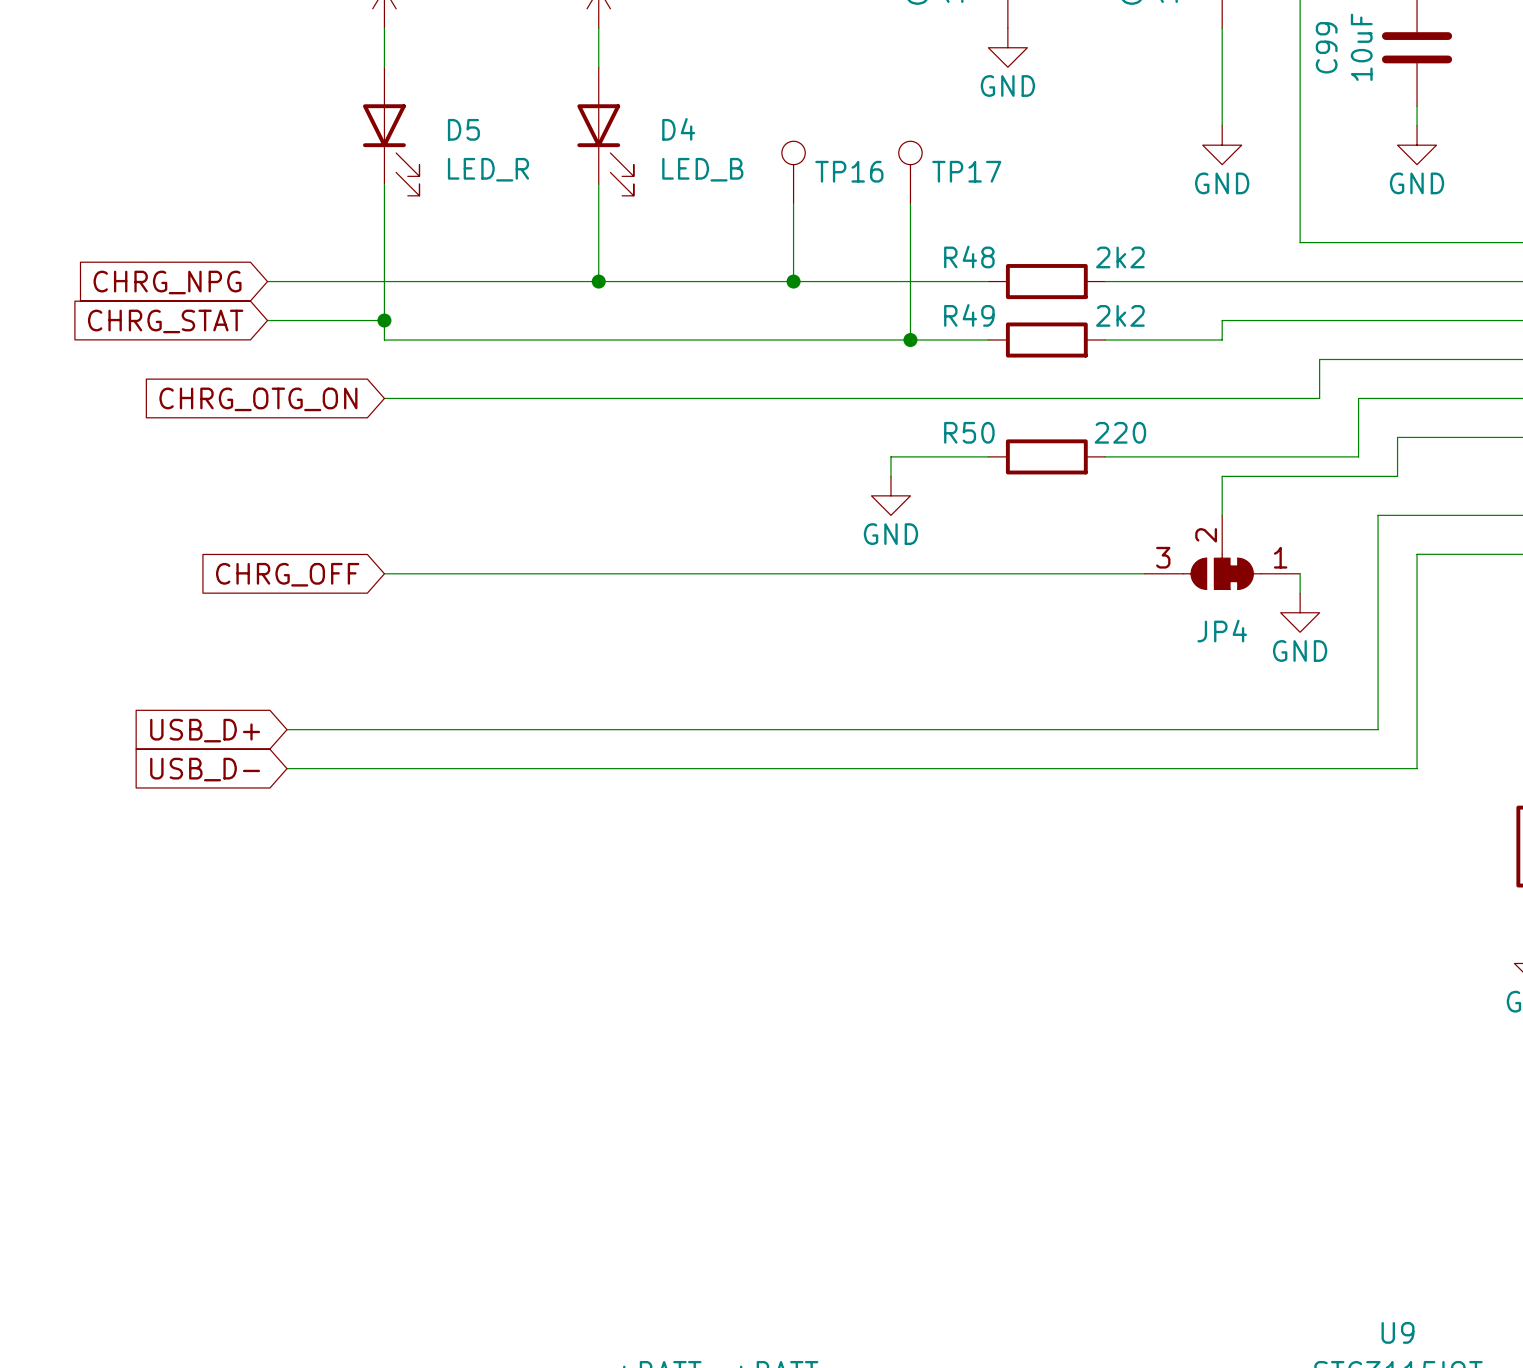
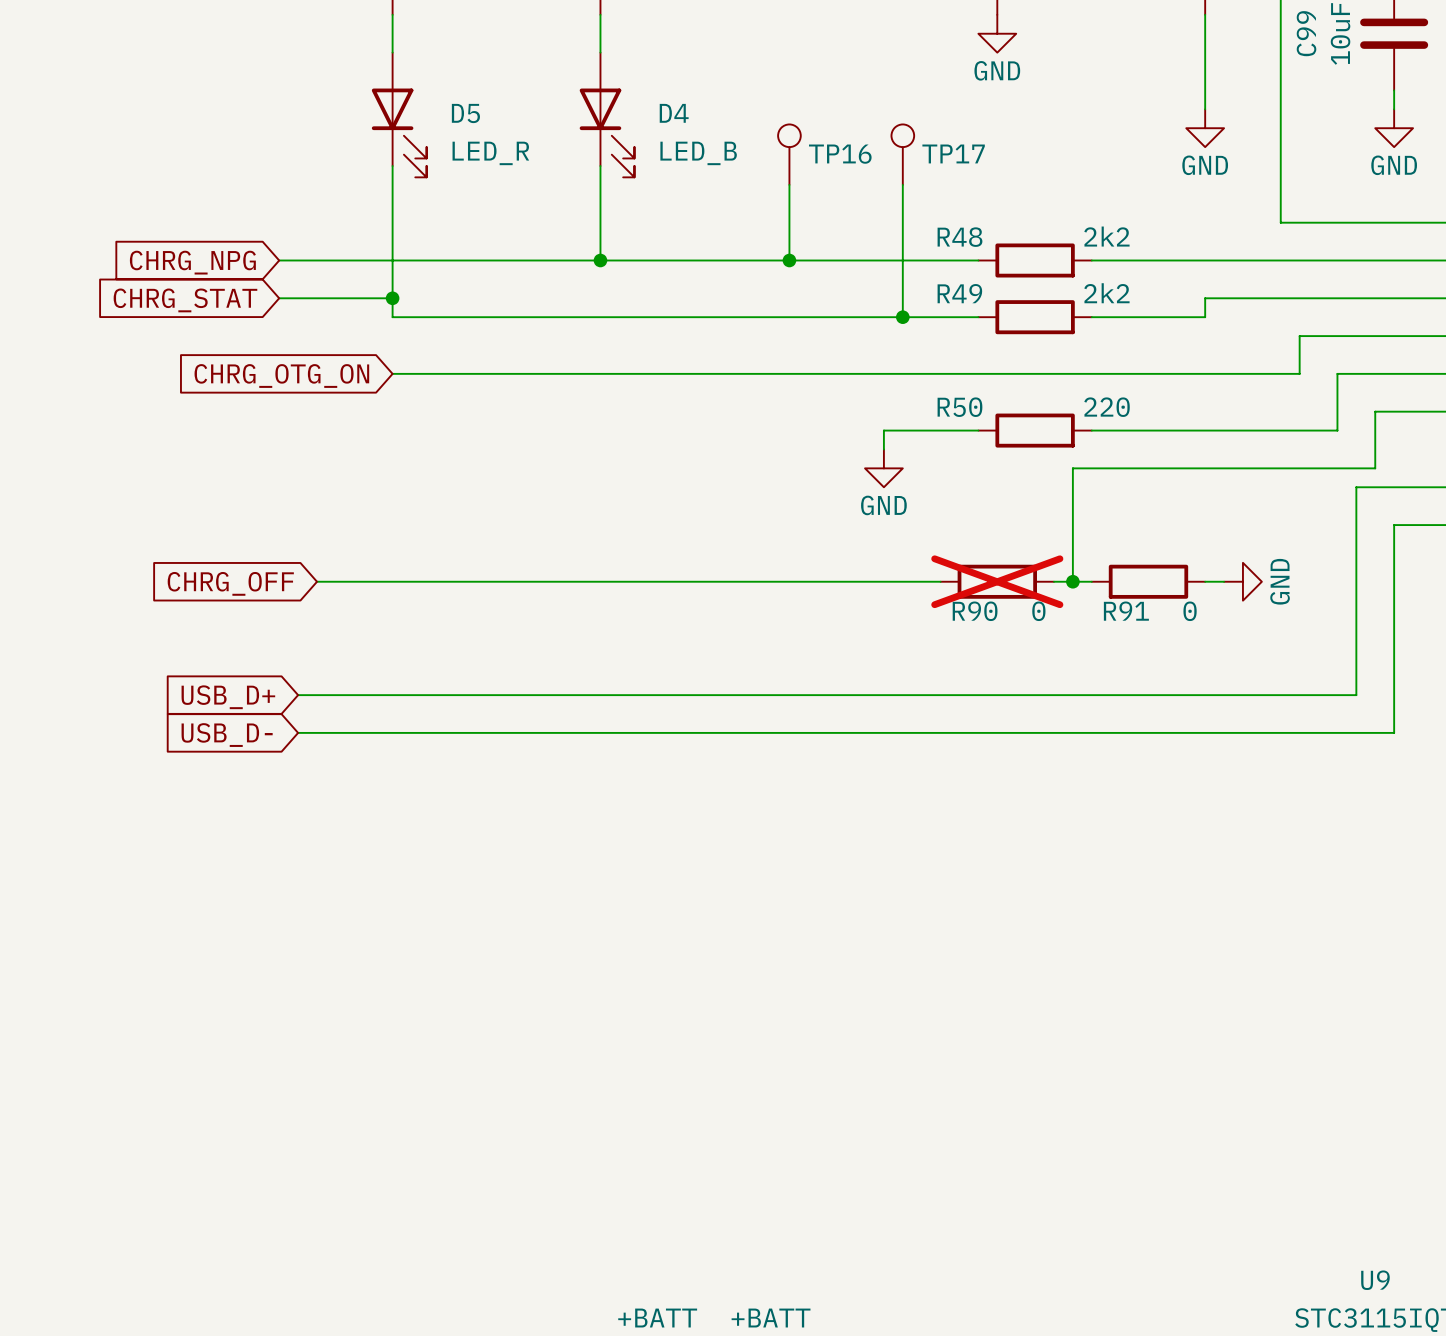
wire: (1397, 476) (1222, 476) (1222, 515) -> (1375, 449) (1375, 468) (1072, 468) (1072, 581)
JP4: (1222, 552) -> none
wire: (384, 573) (1144, 573) -> none
wire: (1300, 573) (1300, 593) -> none
global label position: CHRG_OFF (287, 574) -> CHRG_OFF (230, 583)
wire: none -> (317, 581) (940, 581)
R90: none -> 0 (997, 581)
wire: none -> (1053, 581) (1091, 581)
junction: none -> (1072, 581)
R91: none -> 0 (1148, 581)
wire: none -> (1205, 581) (1224, 581)
power symbol rotation: 0° (1300, 612) -> 90° counterclockwise (1242, 581)
power symbol position: GND (1300, 612) -> GND (1242, 581)

